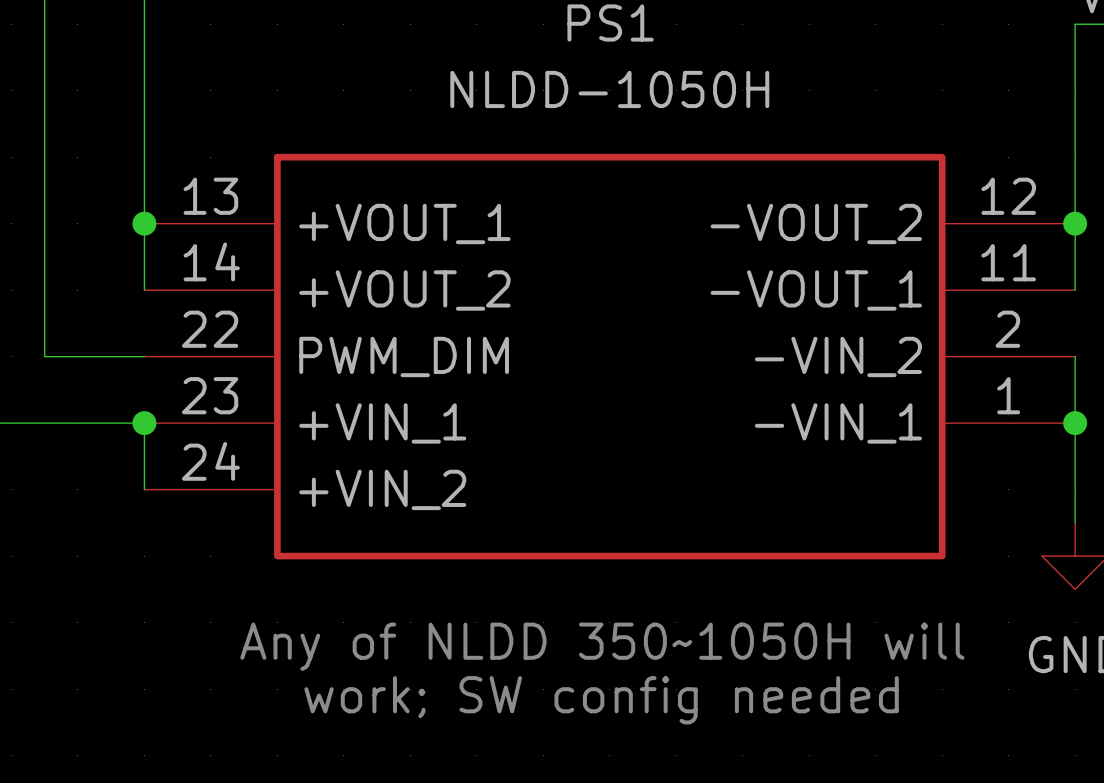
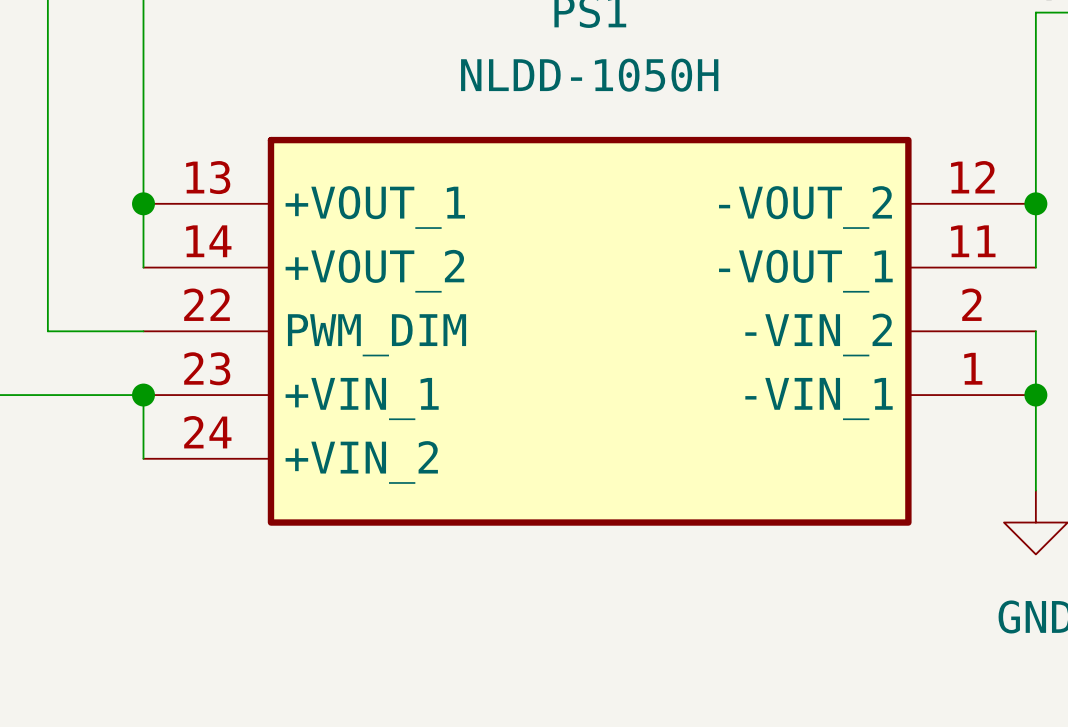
text: Any of NLDD 350~1050H will (602, 646) -> none
text: work; SW config needed (601, 700) -> none

